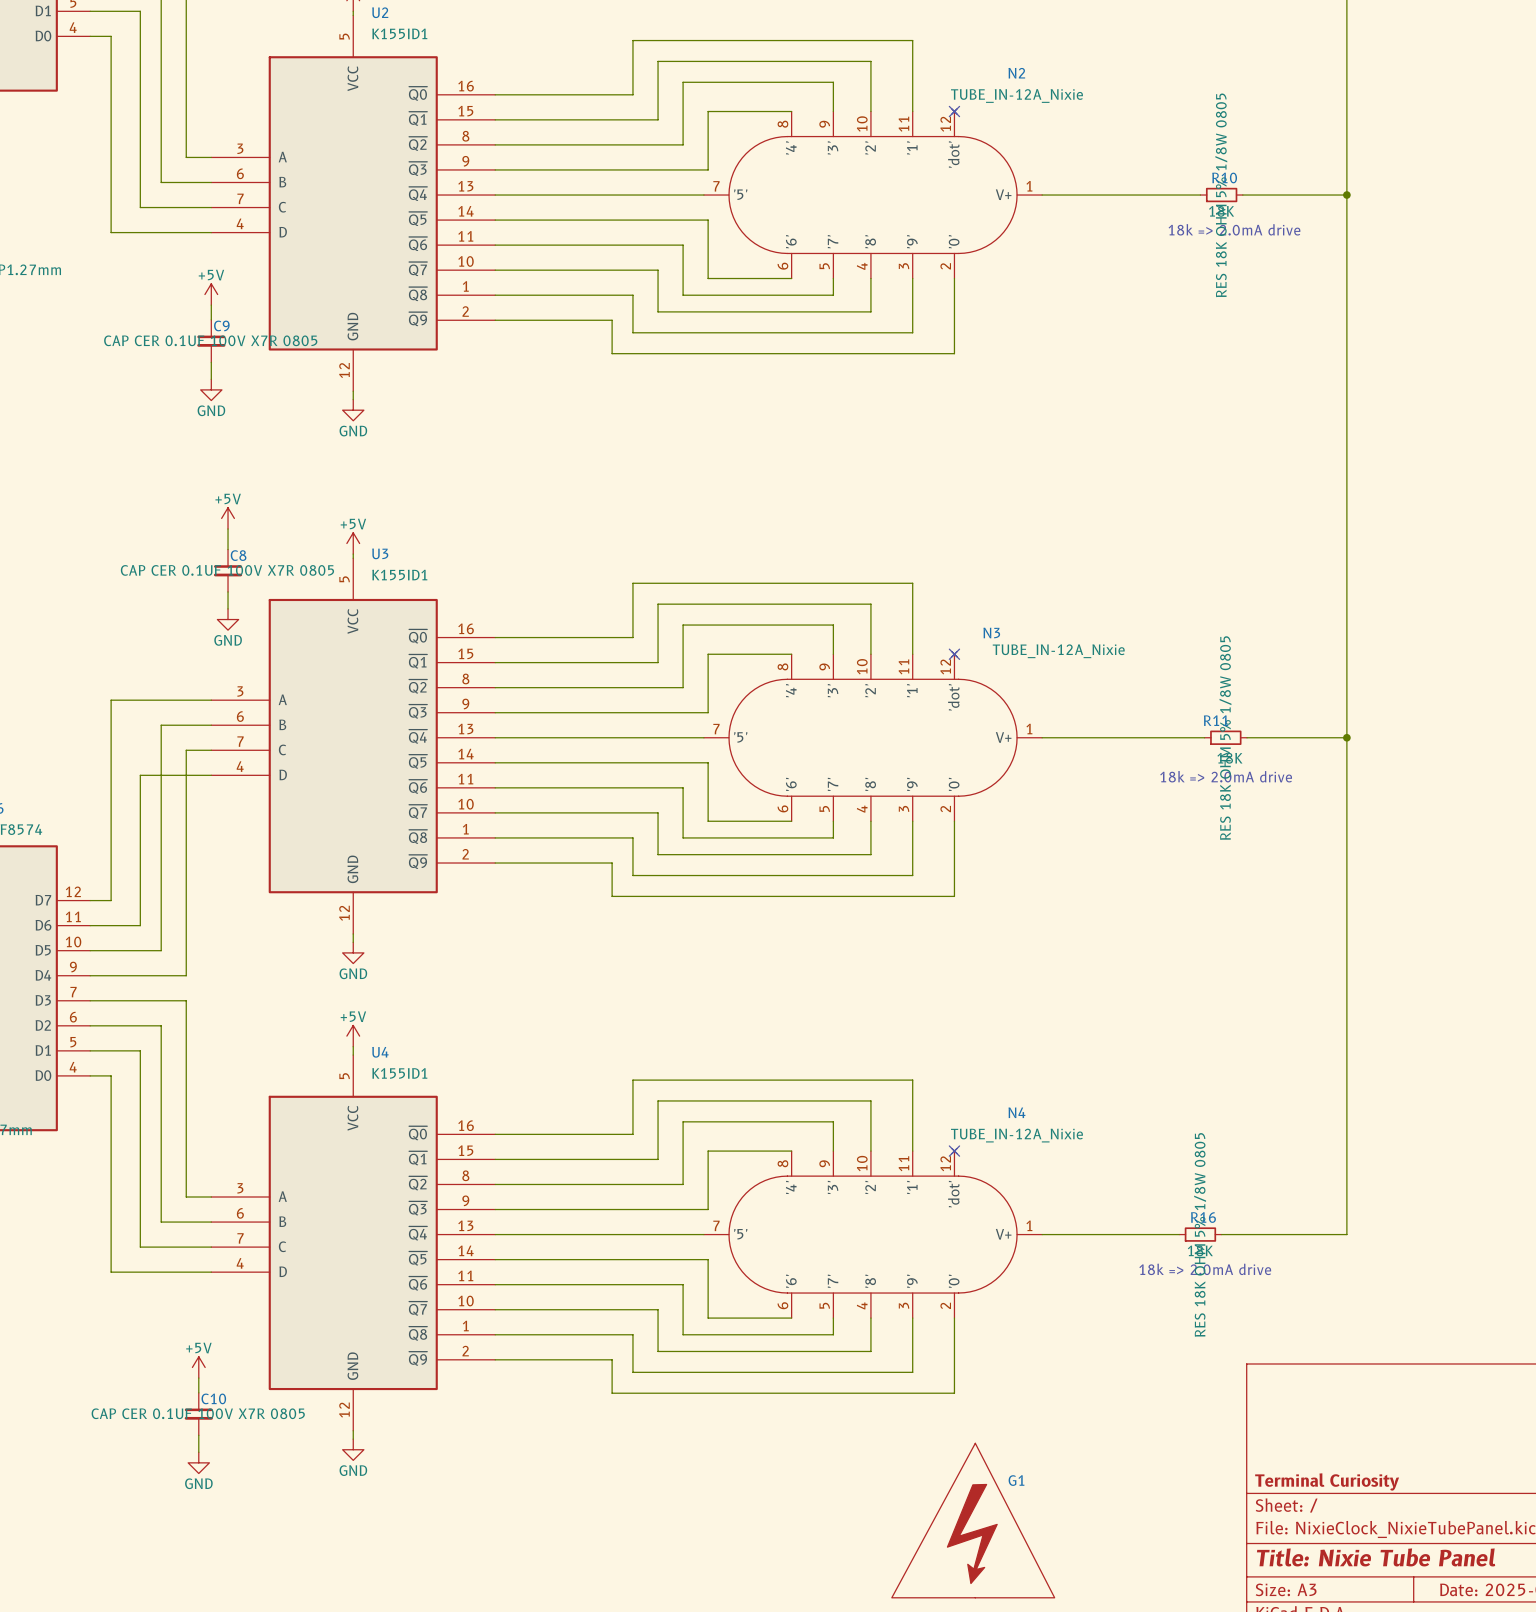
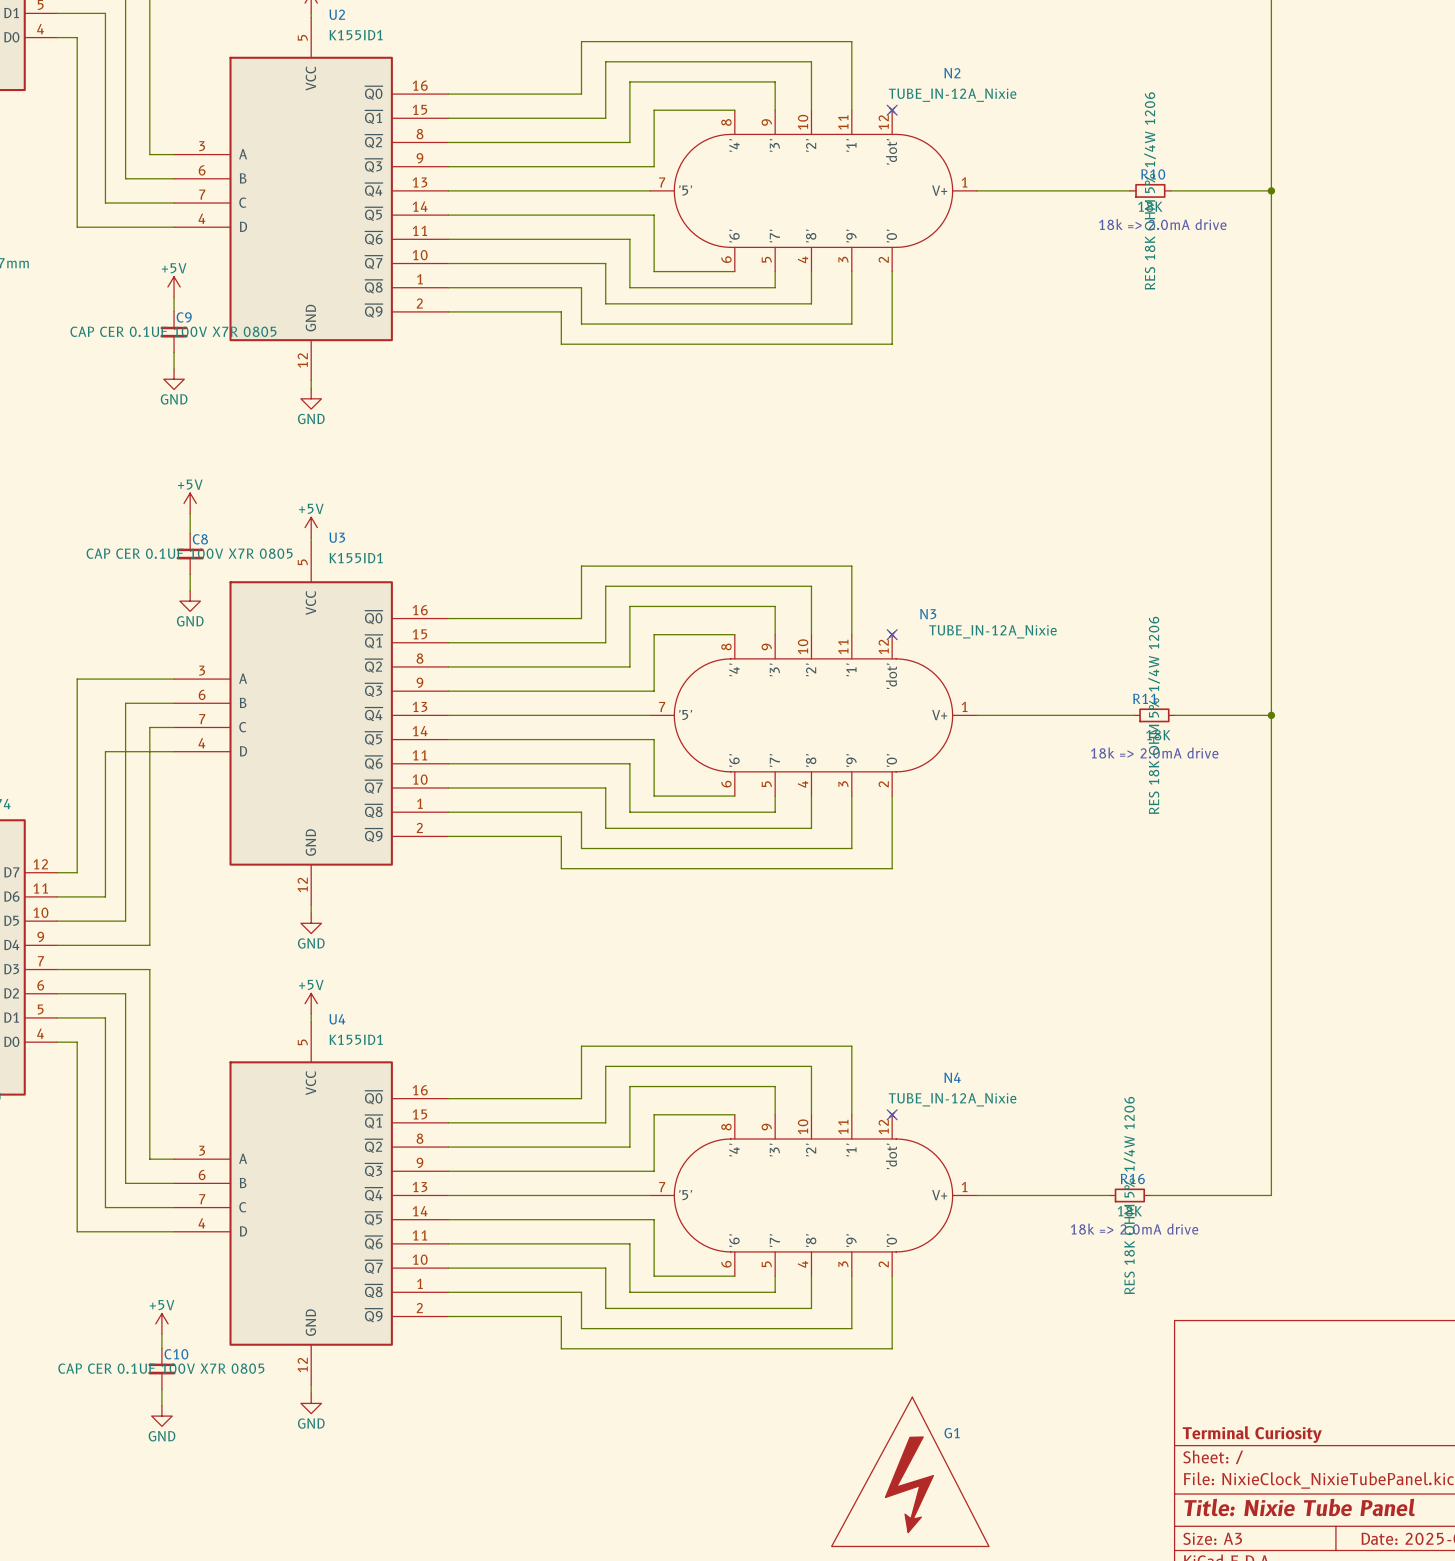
R10 text: RES 18K OHM 5% 1/8W 0805 (1221, 195) -> RES 18K OHM 5% 1/4W 1206 (1150, 190)
R11 text: RES 18K OHM 5% 1/8W 0805 (1225, 738) -> RES 18K OHM 5% 1/4W 1206 (1154, 715)
R16 text: RES 18K OHM 5% 1/8W 0805 (1200, 1234) -> RES 18K OHM 5% 1/4W 1206 (1129, 1195)

